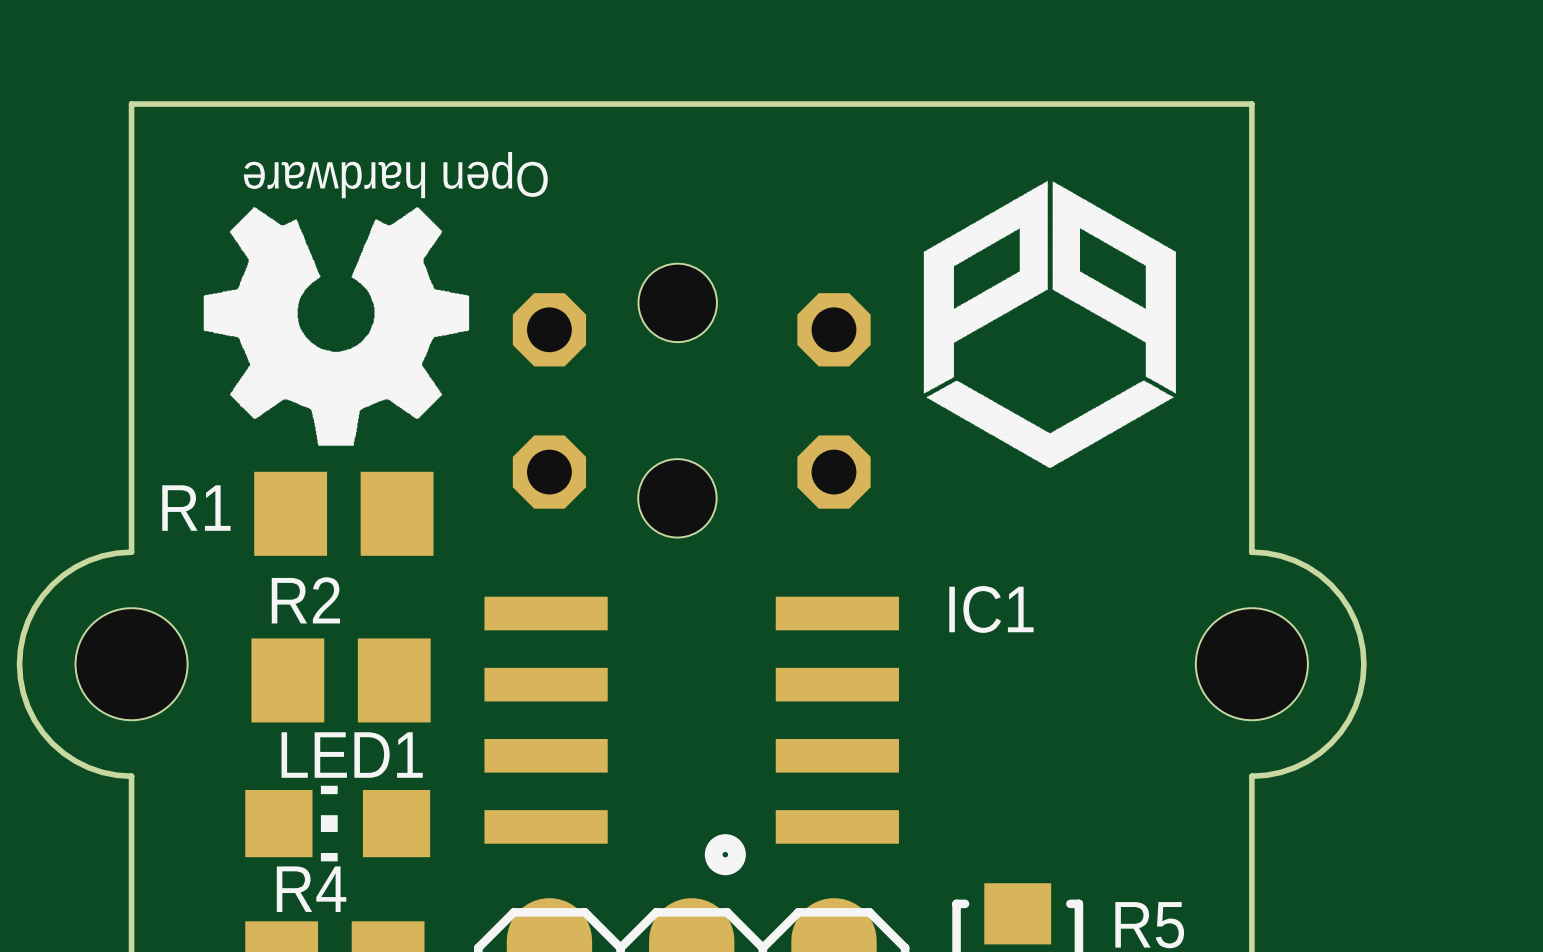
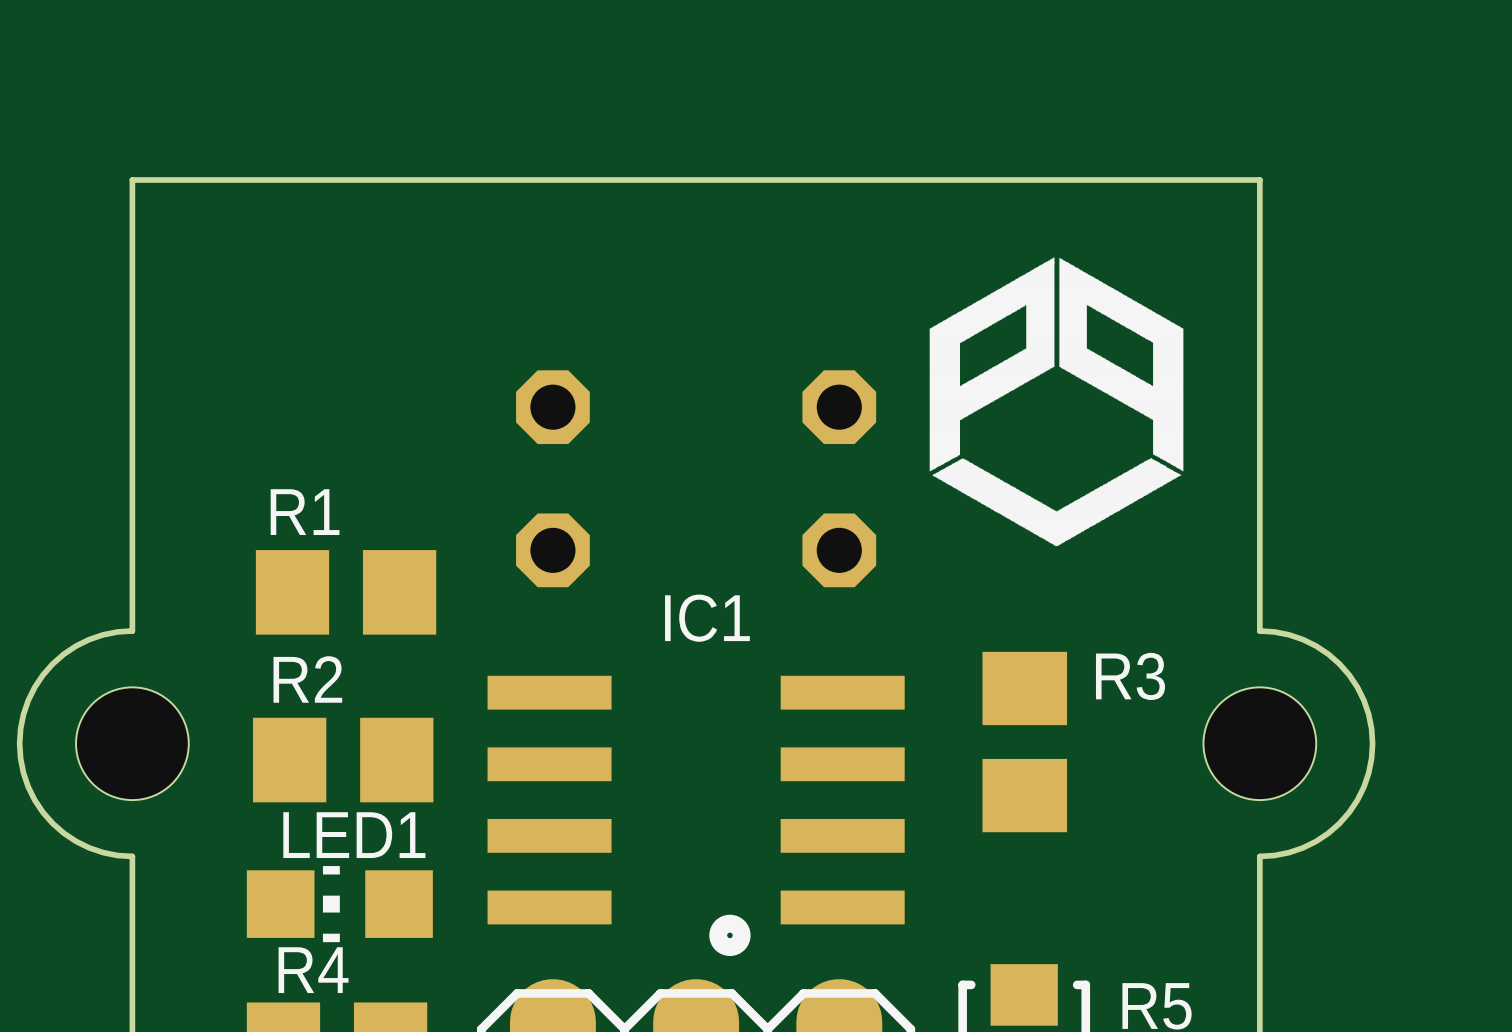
text: Open hardware (395, 175) -> none
drawing: [203, 207, 470, 446] -> none
hole: (677, 302) -> none
hole: (677, 498) -> none
R1 name position: R1 (196, 508) -> R1 (305, 512)
IC1 name position: IC1 (991, 609) -> IC1 (707, 618)
R3: none -> (1024, 742)

